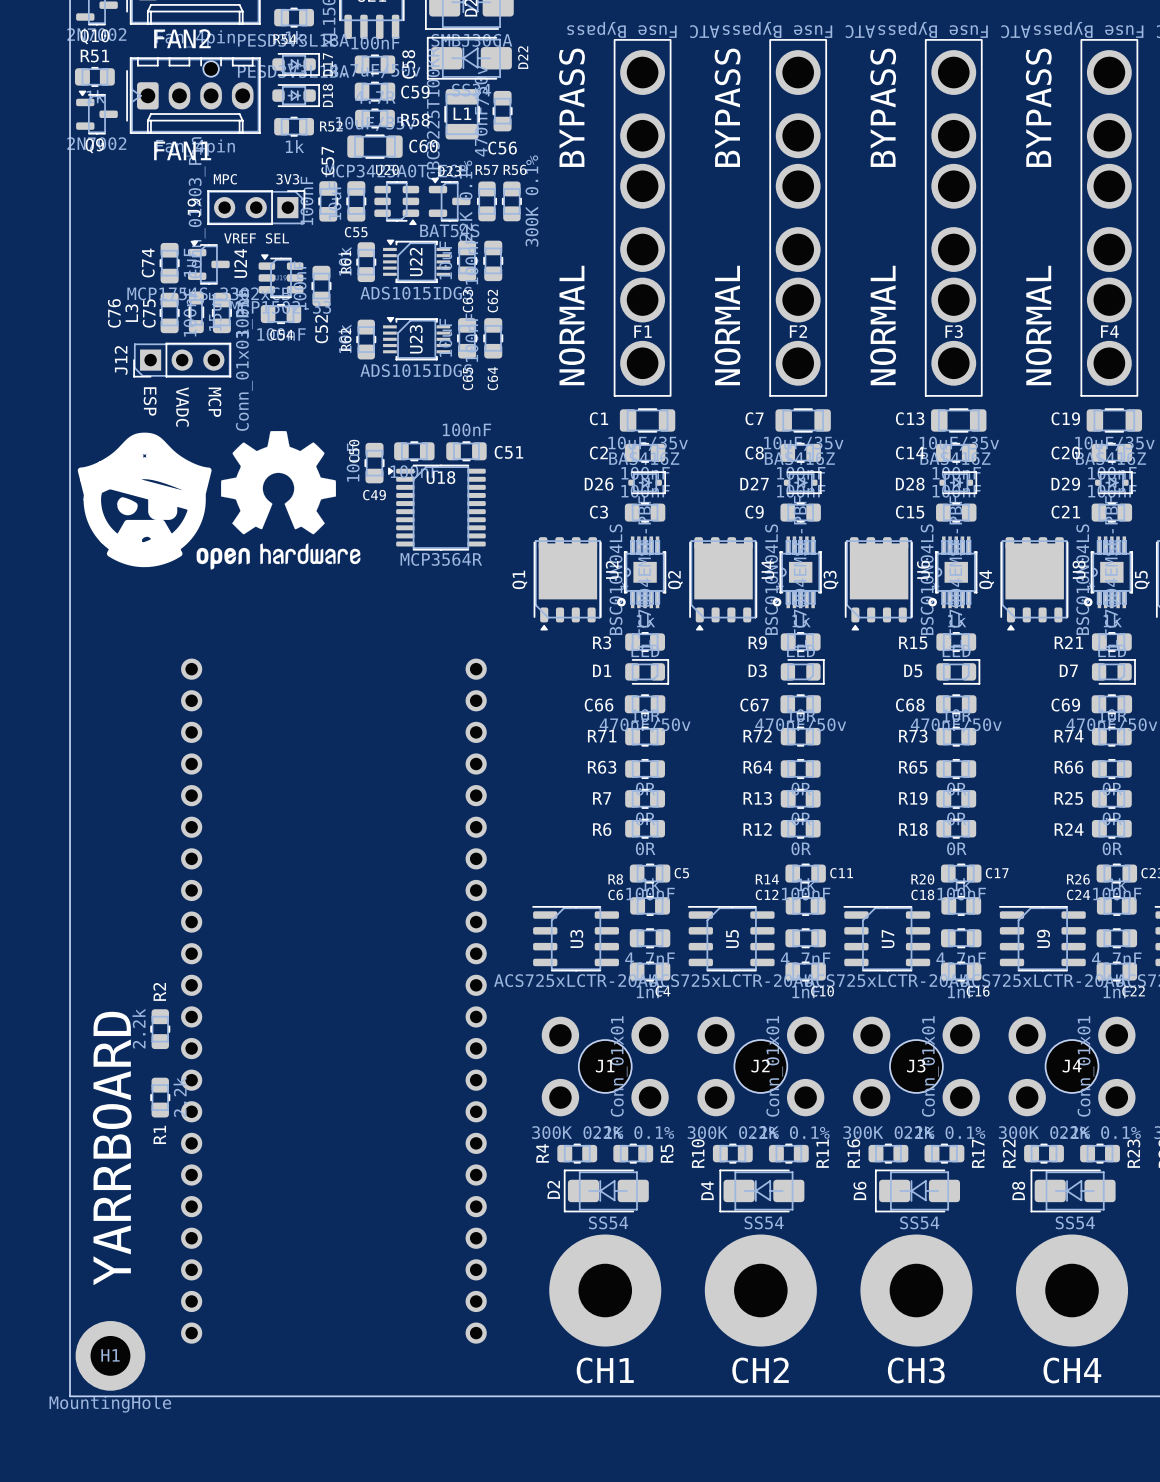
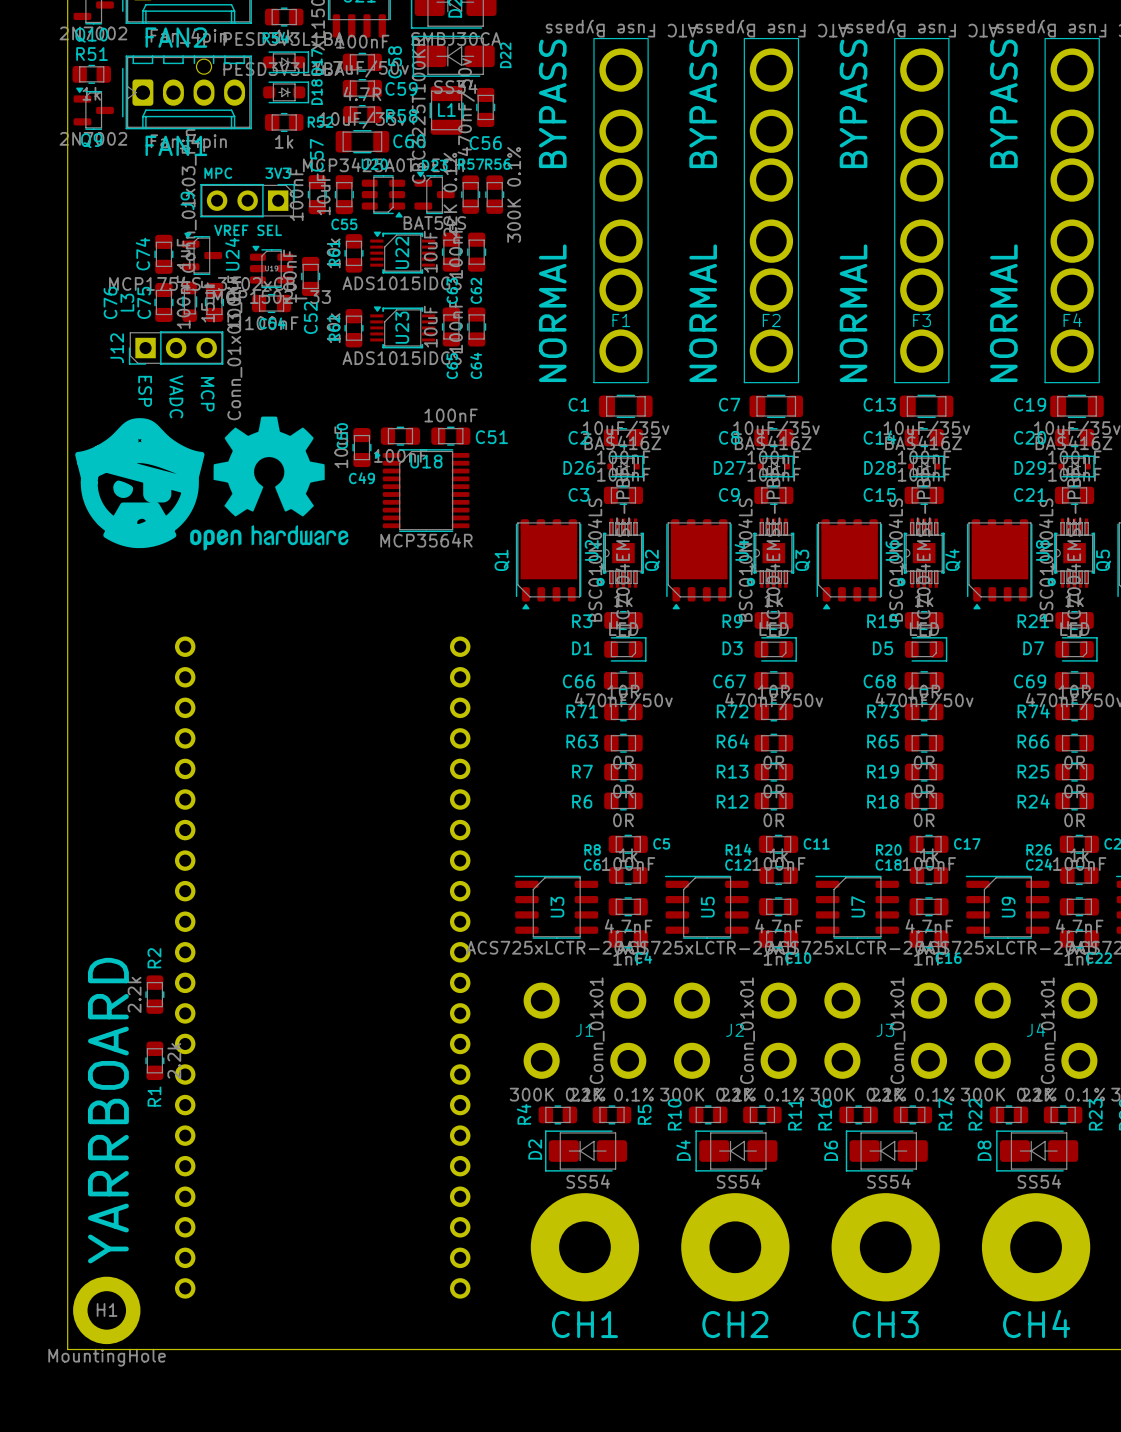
J1 footprint: [541, 1016, 669, 1117] -> [523, 982, 647, 1079]
J2 footprint: [697, 1016, 825, 1117] -> [673, 982, 797, 1079]
J3 footprint: [852, 1016, 980, 1117] -> [824, 982, 948, 1079]
J4 footprint: [1008, 1016, 1136, 1117] -> [974, 982, 1098, 1079]

